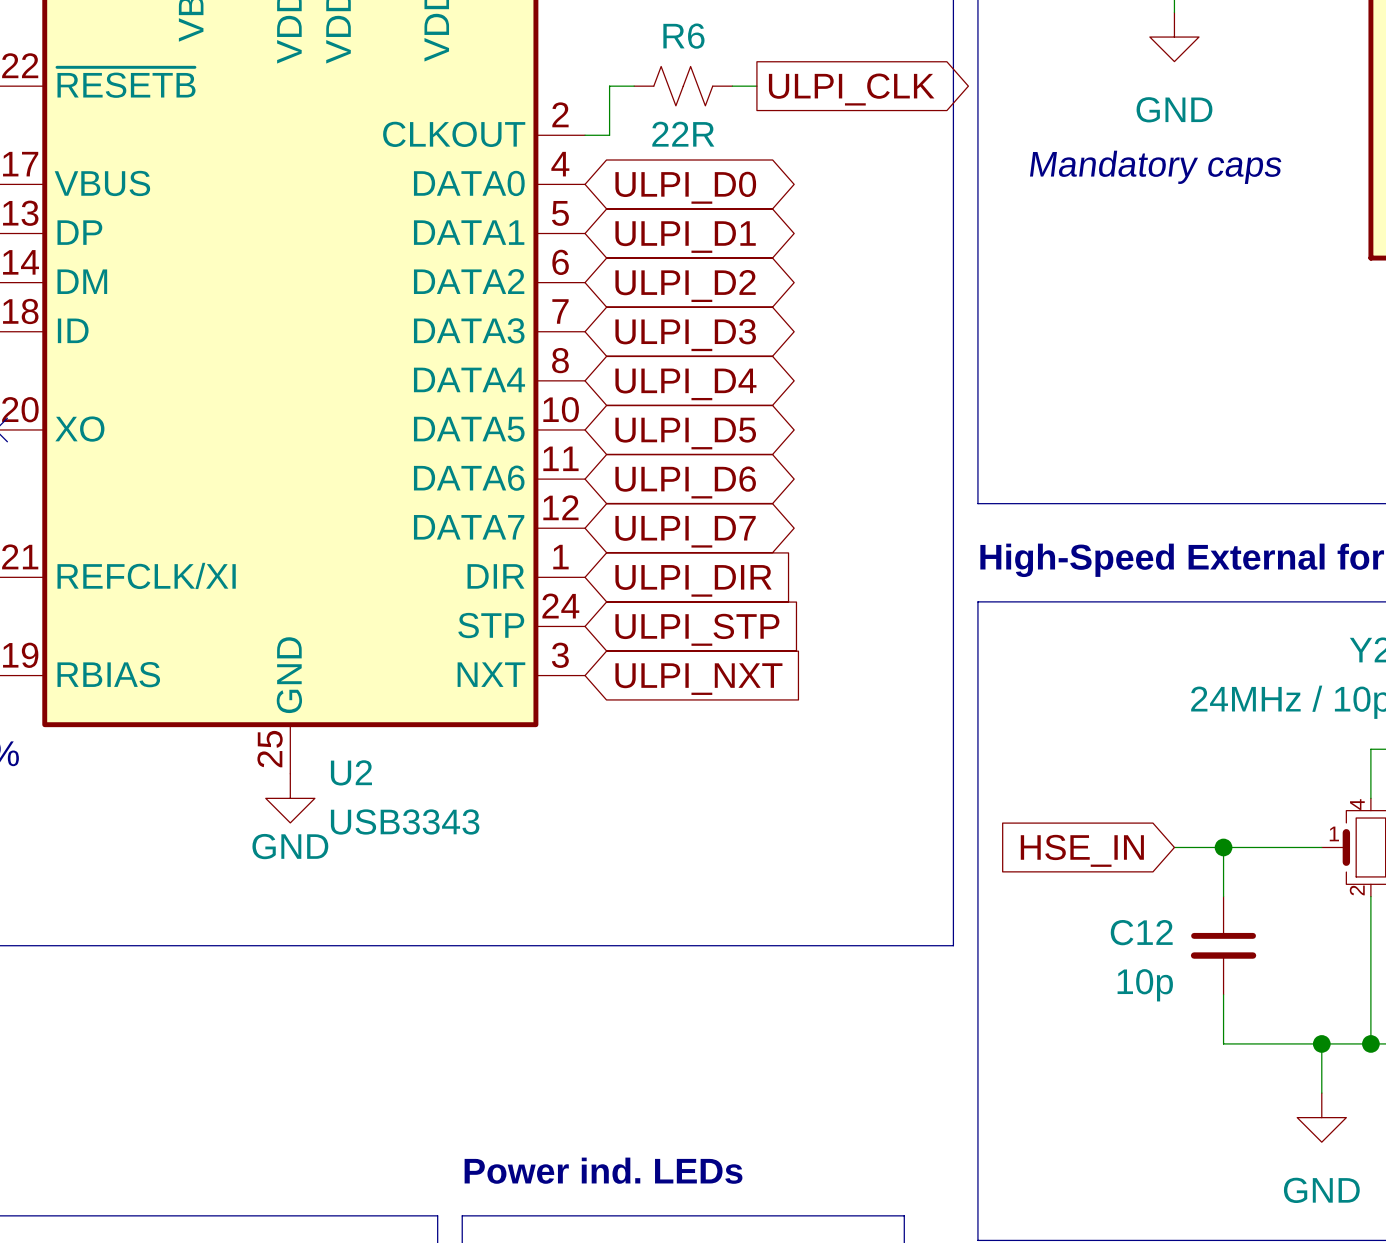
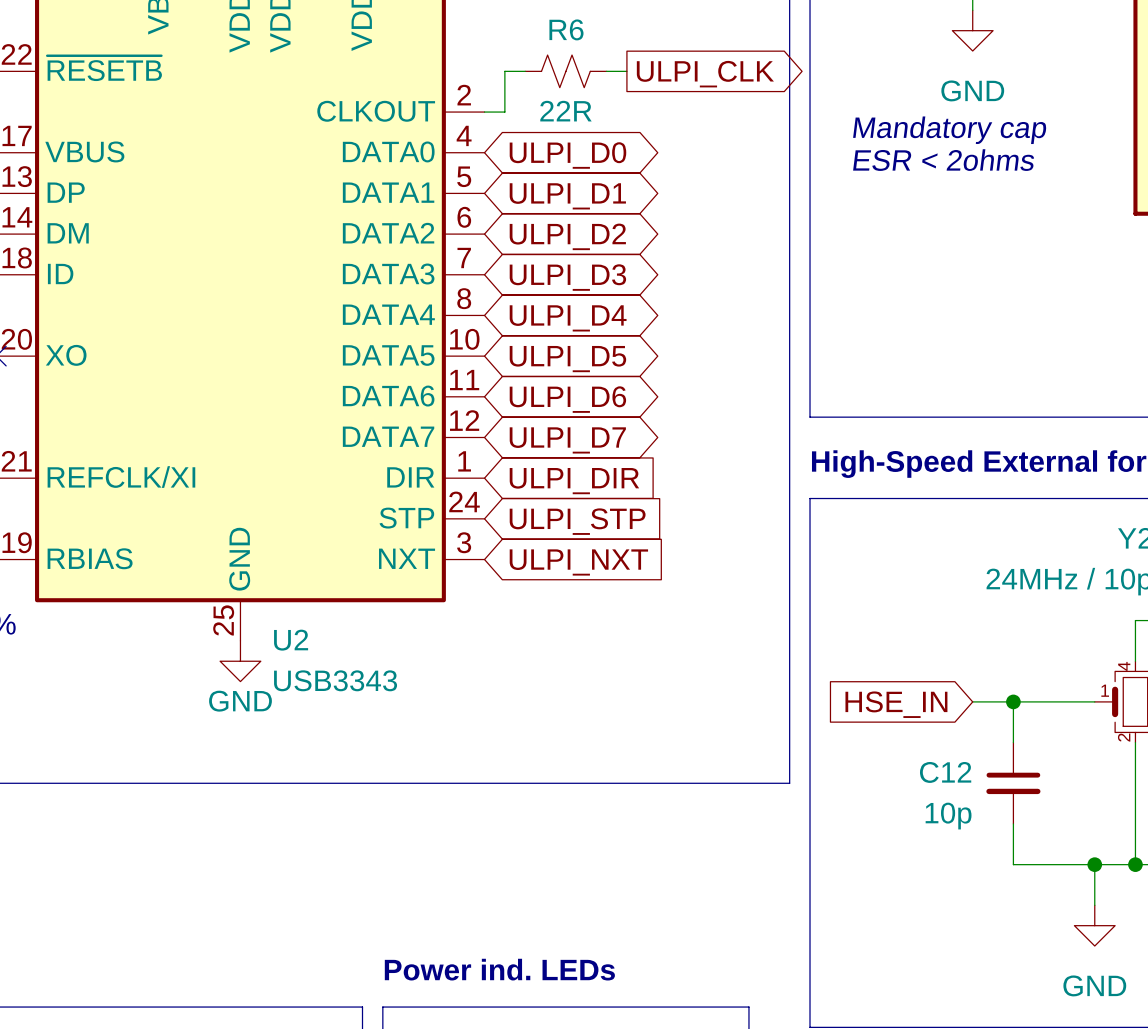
text: Mandatory caps (1155, 167) -> Mandatory cap (949, 130)
text: none -> ESR < 2ohms (943, 160)

